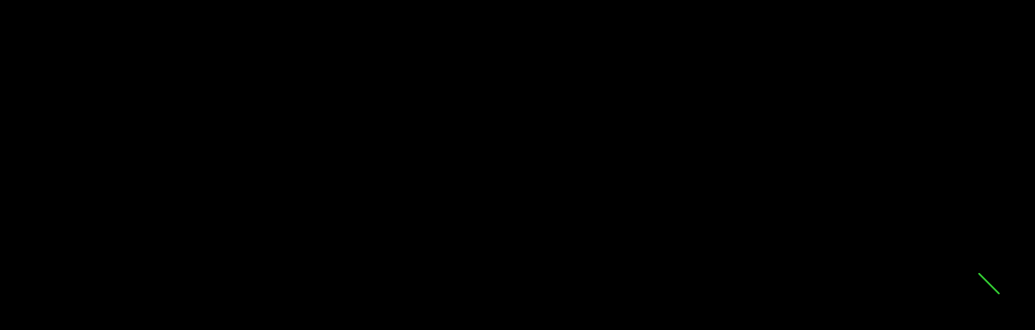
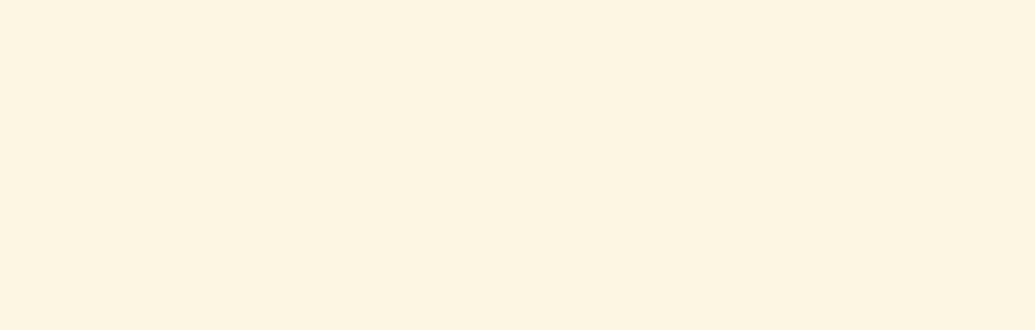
wire: (979, 273) (998, 293) -> none

